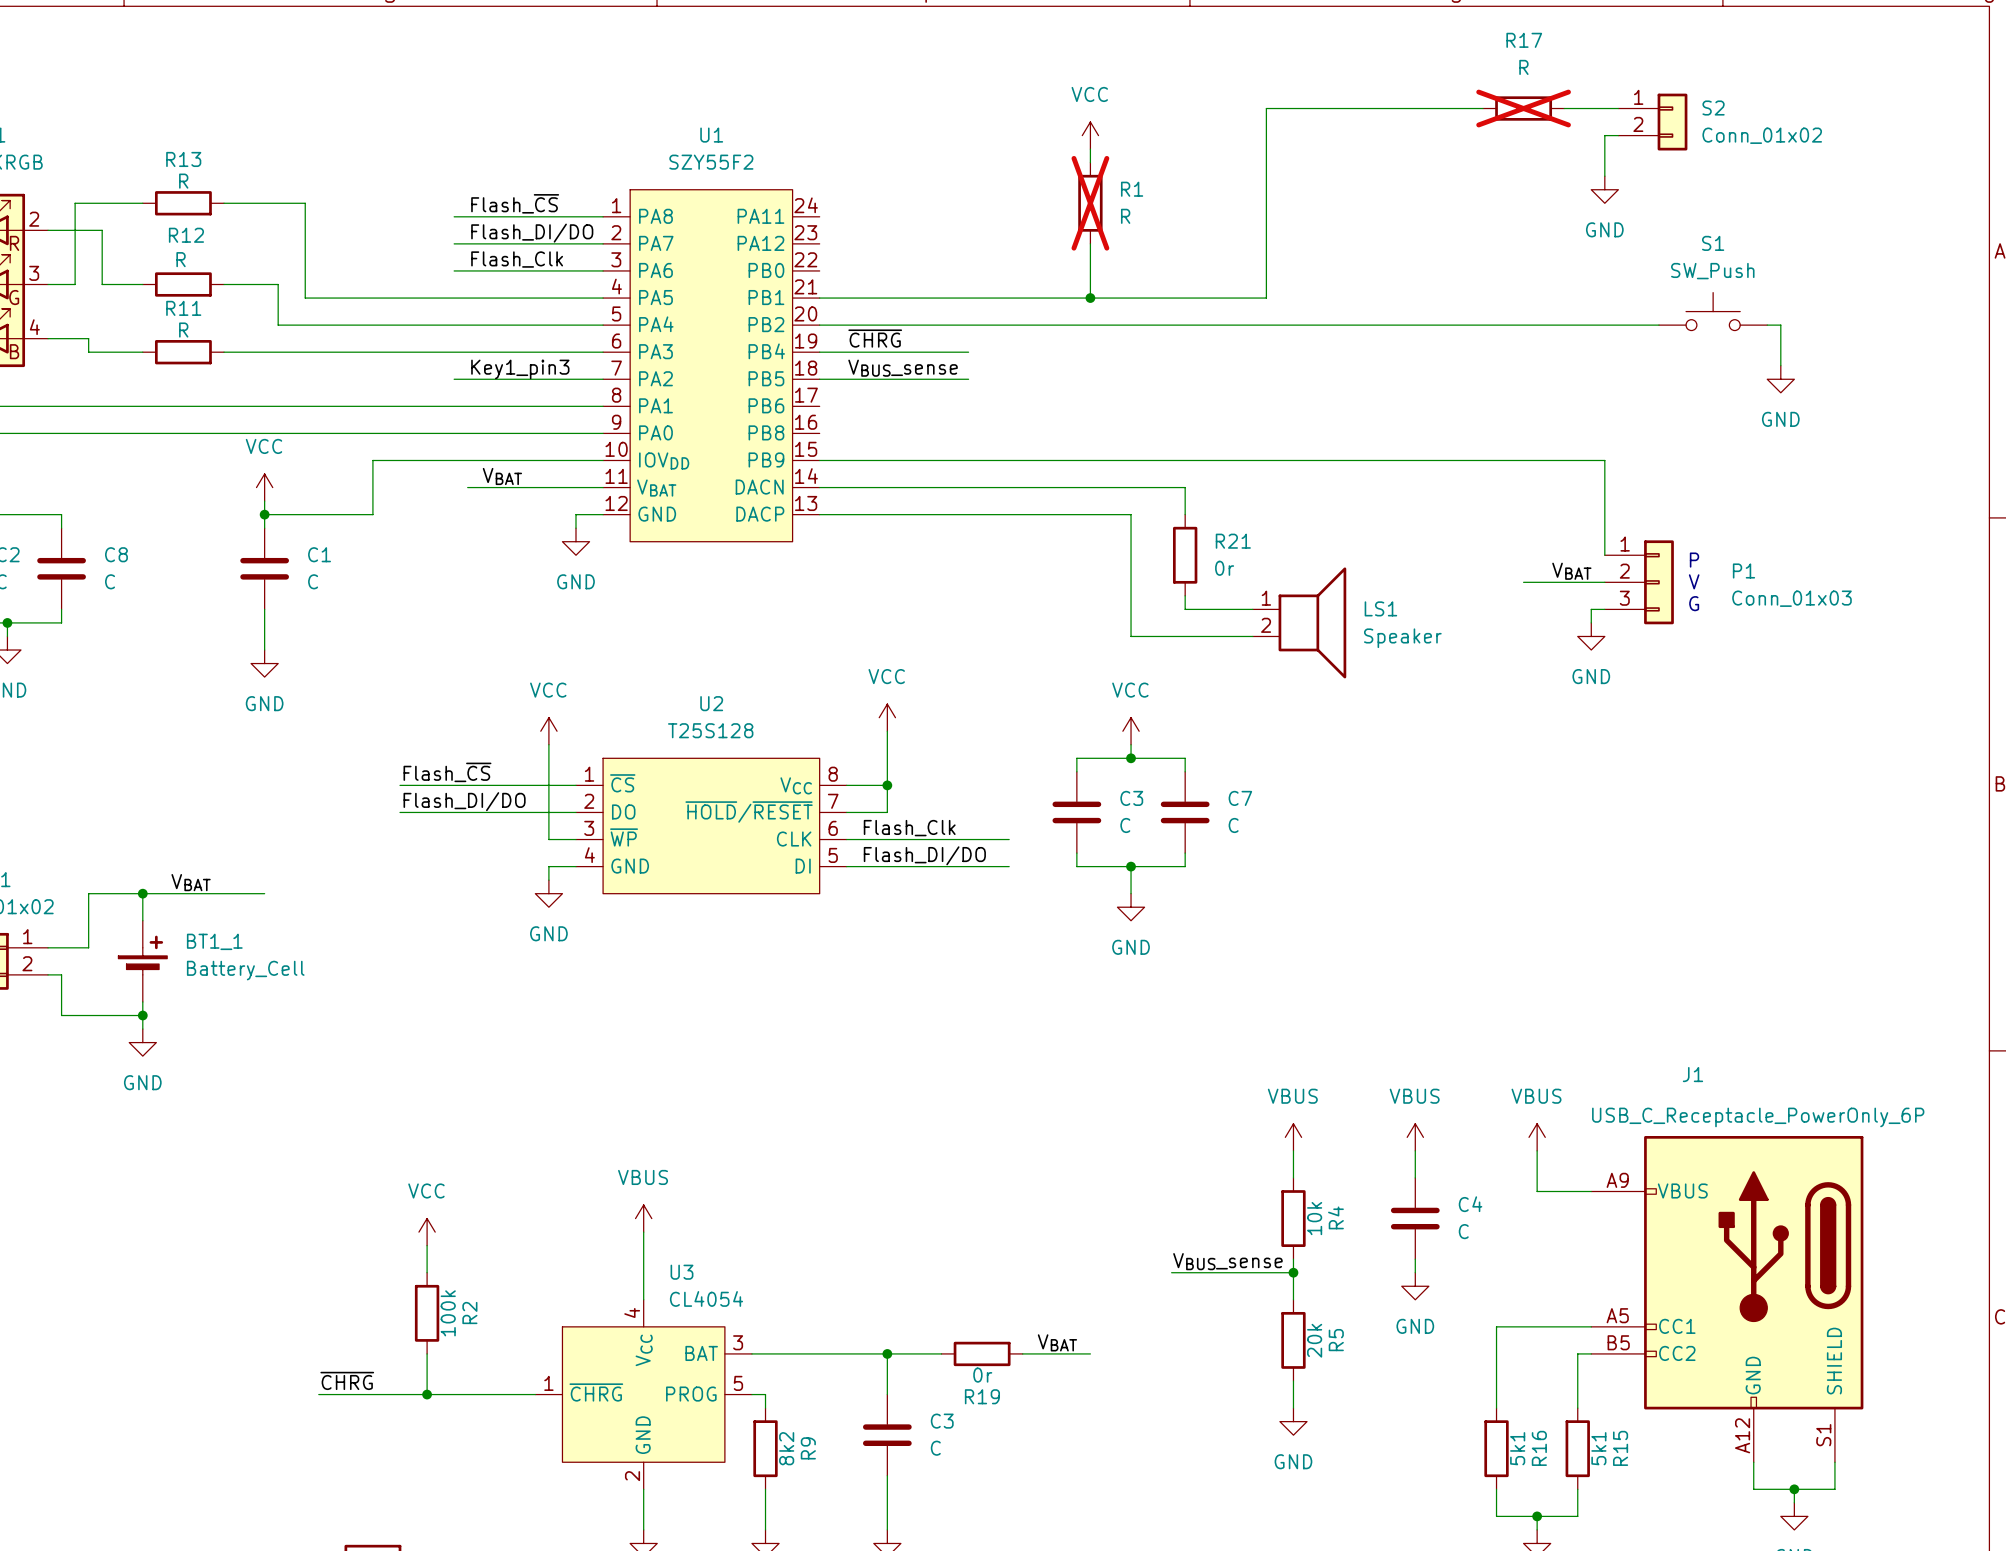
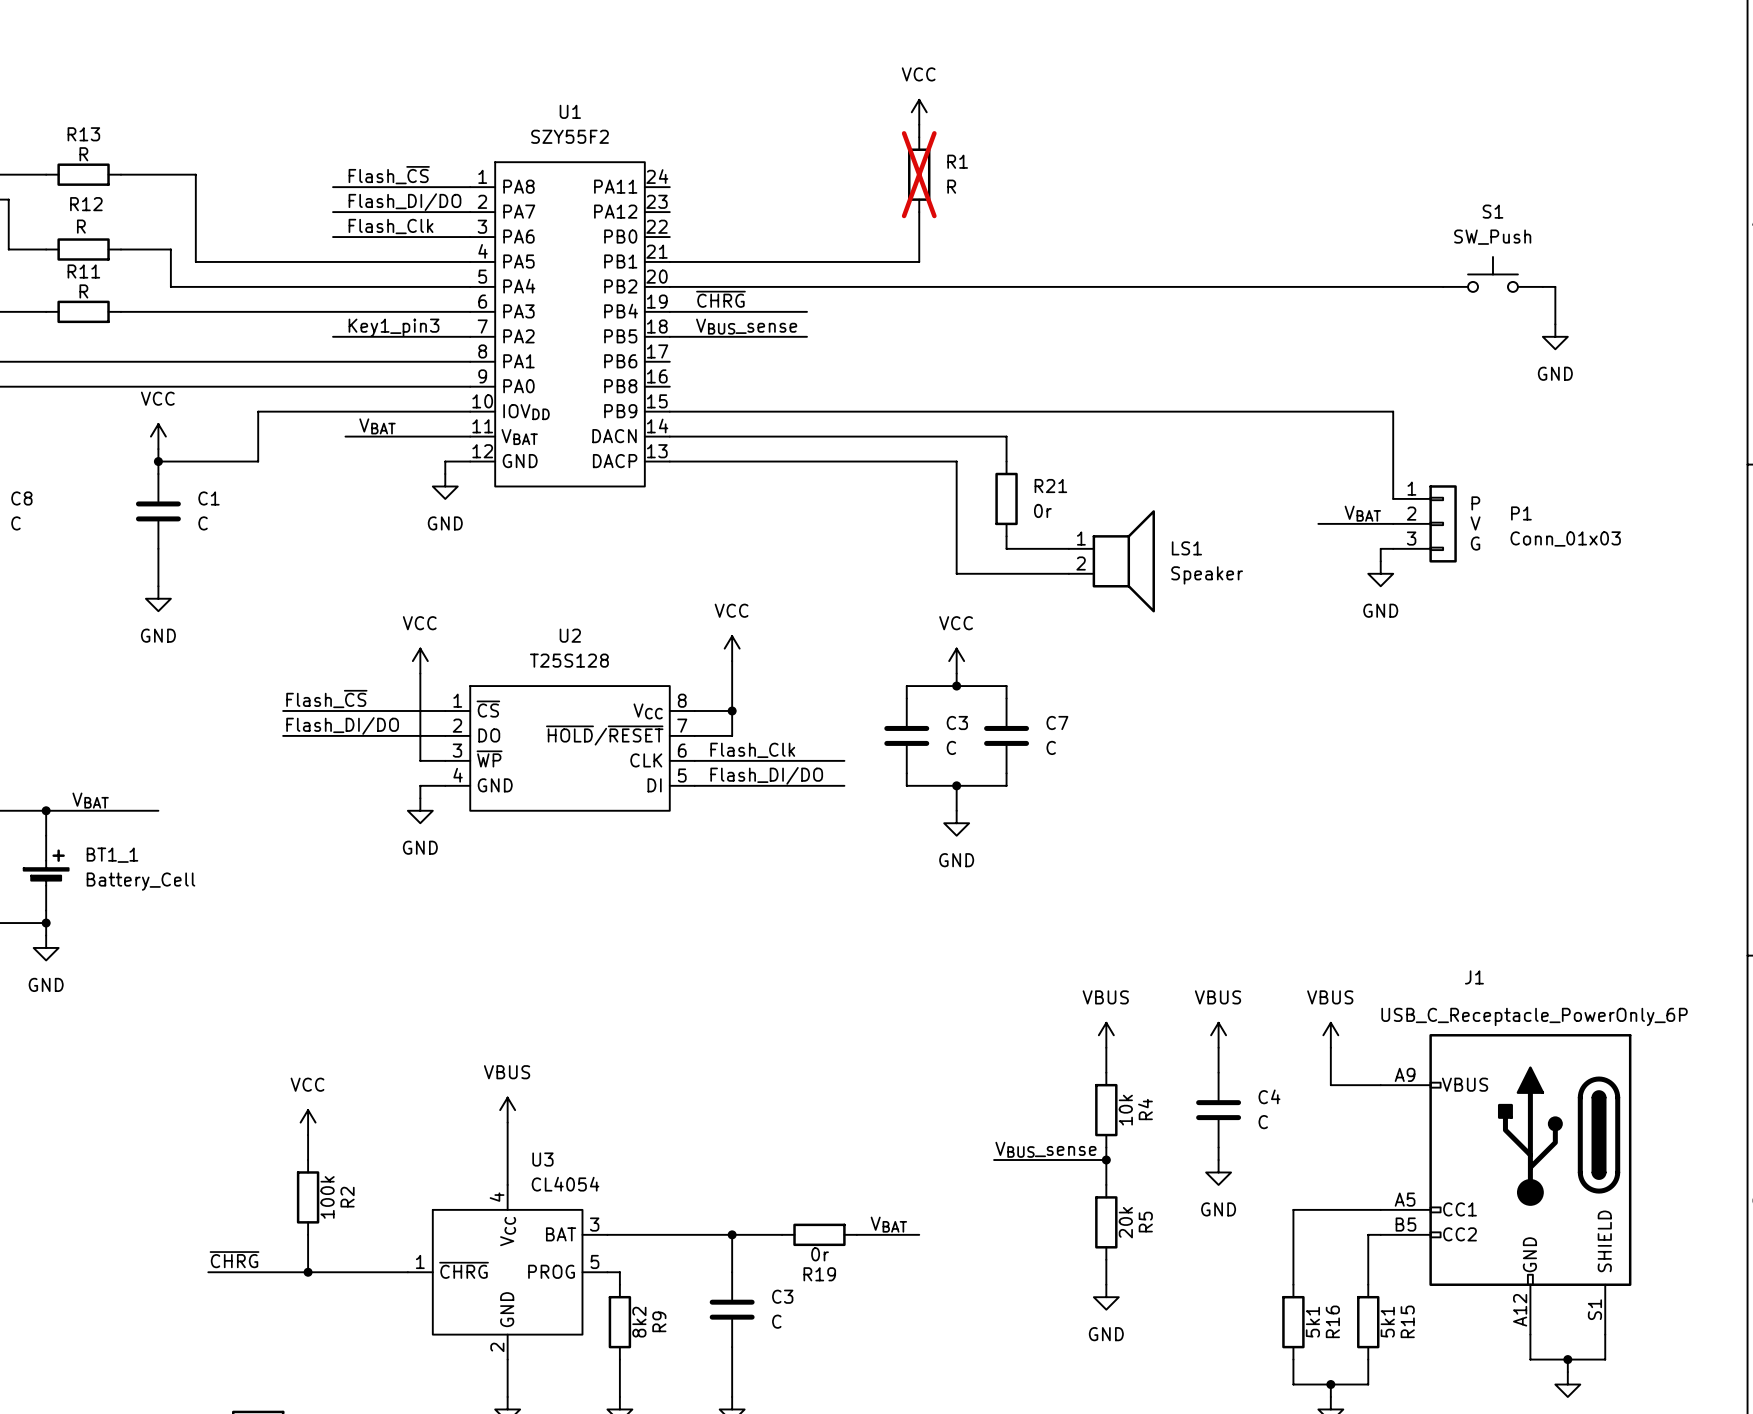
wire: (1482, 108) (1266, 108) (1266, 298) (1090, 298) -> none
R17: R (1523, 108) -> none
wire: (1564, 108) (1618, 108) -> none
S2: Conn_01x02 (1652, 122) -> none
wire: (1618, 135) (1604, 135) (1604, 176) -> none
power symbol: GND (1604, 189) -> none
junction: (1090, 298) -> none

